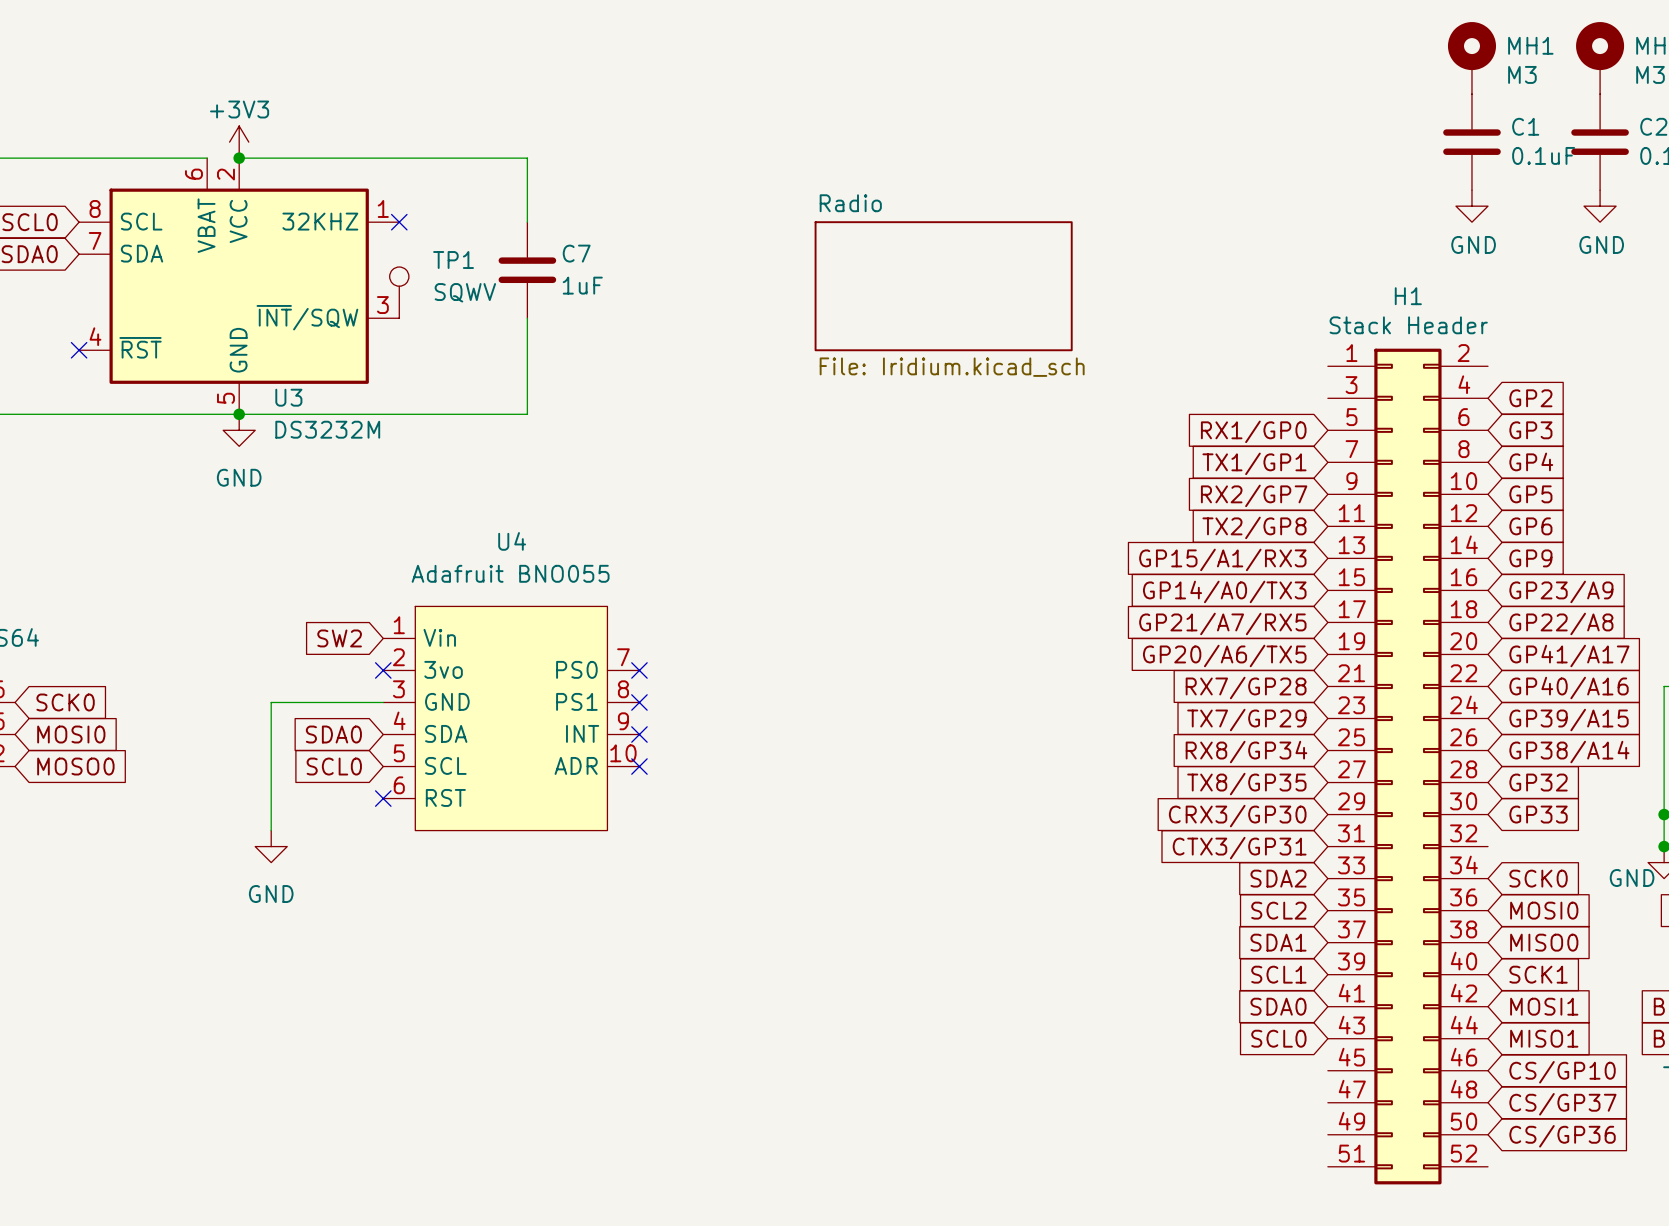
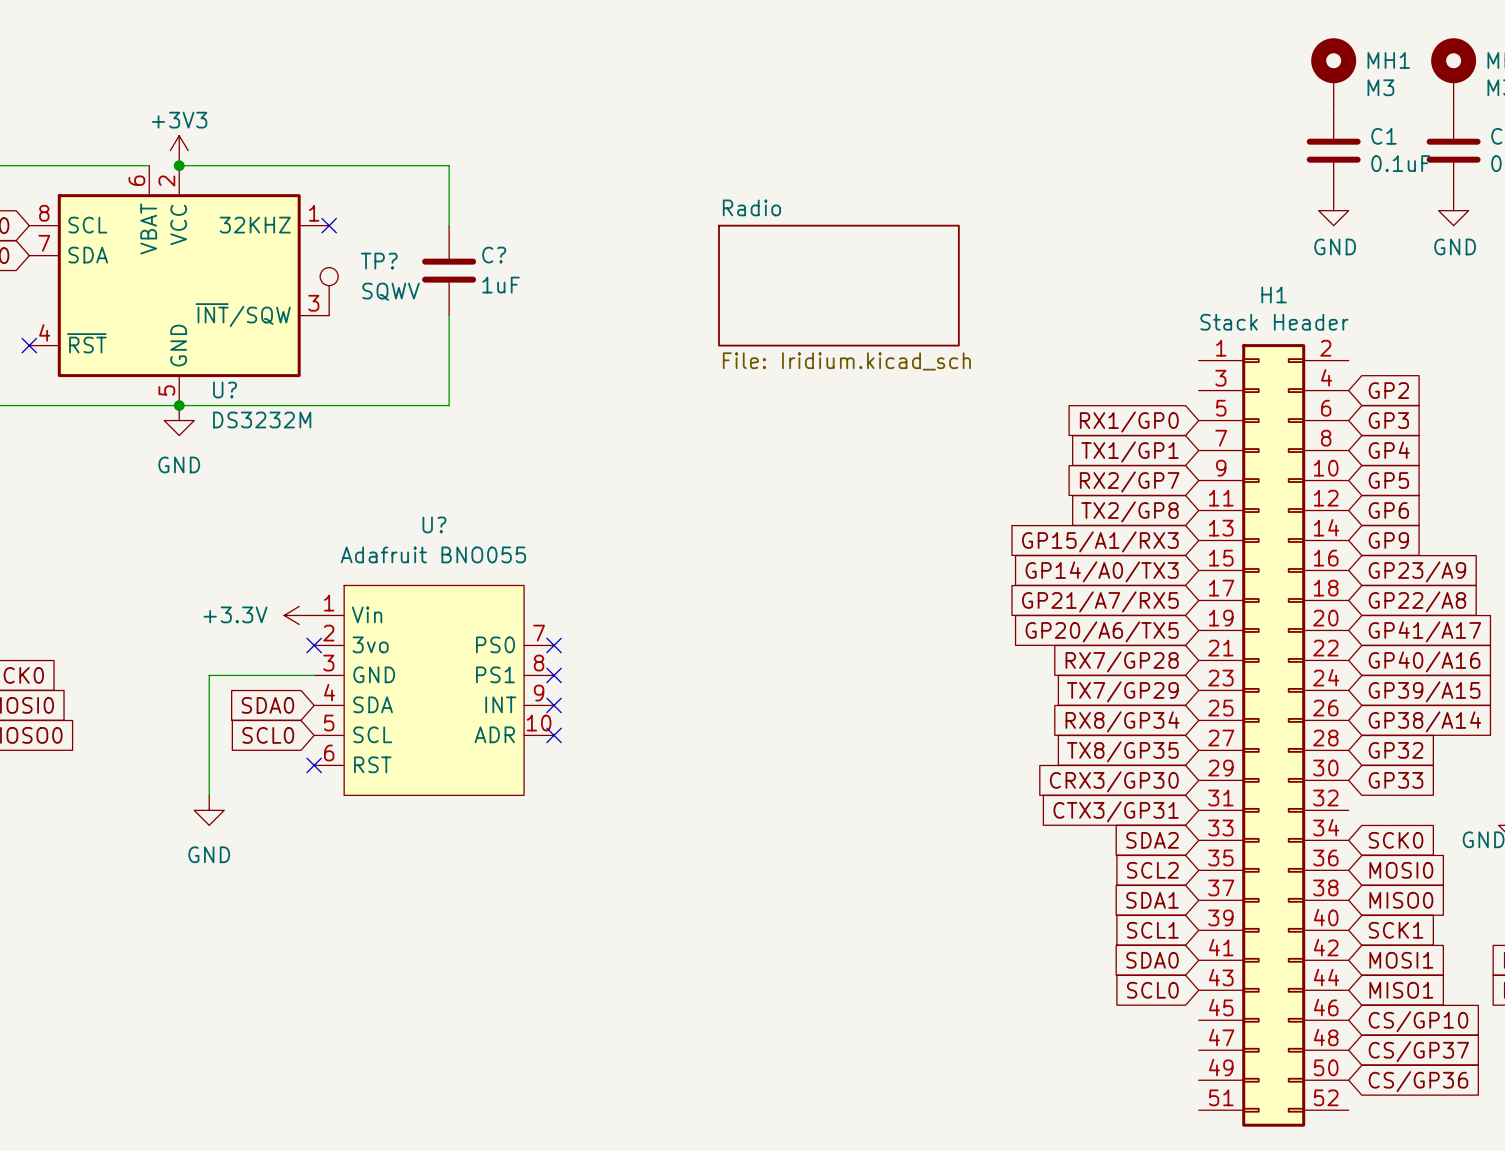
C7 name: C7 (576, 253) -> C? (494, 255)
TP1 name: TP1 (453, 260) -> TP? (379, 261)
U3 name: U3 (288, 397) -> U? (225, 390)
U4 name: U4 (512, 541) -> U? (434, 524)
global label: SW2 (339, 638) -> none
power symbol: none -> +3.3V (299, 615)

